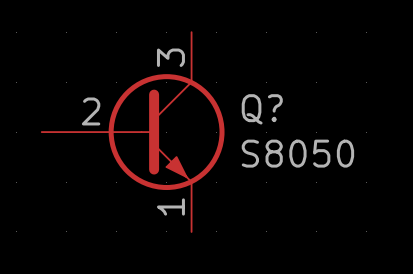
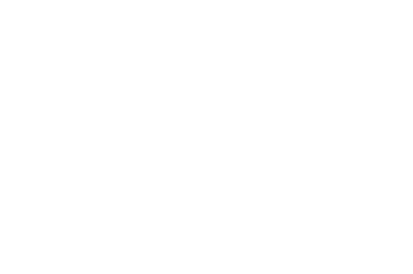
Q?: S8050 (133, 132) -> none

